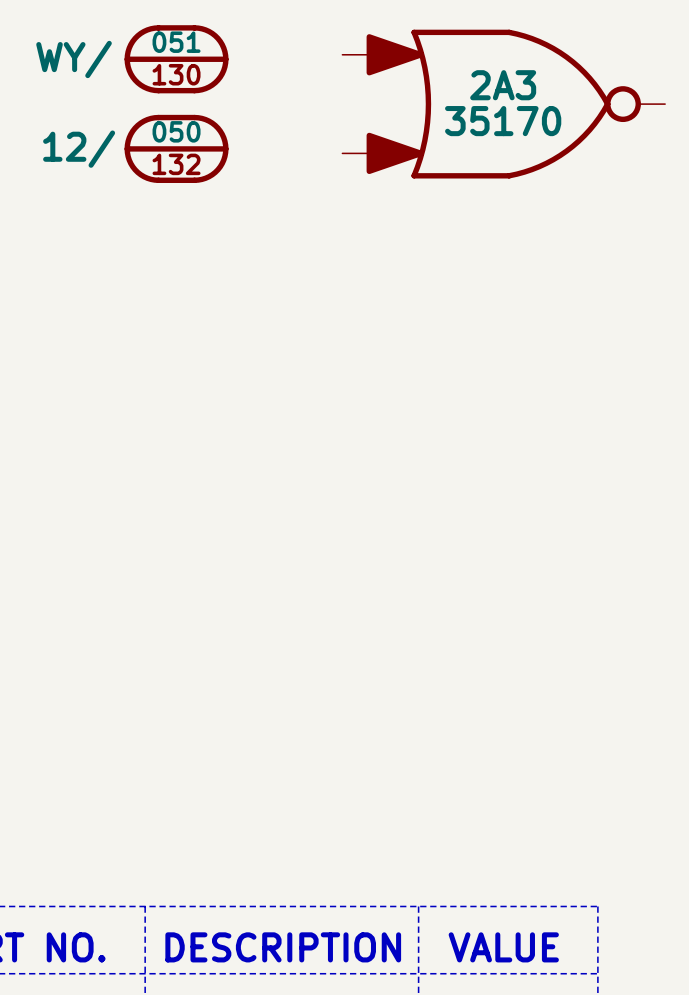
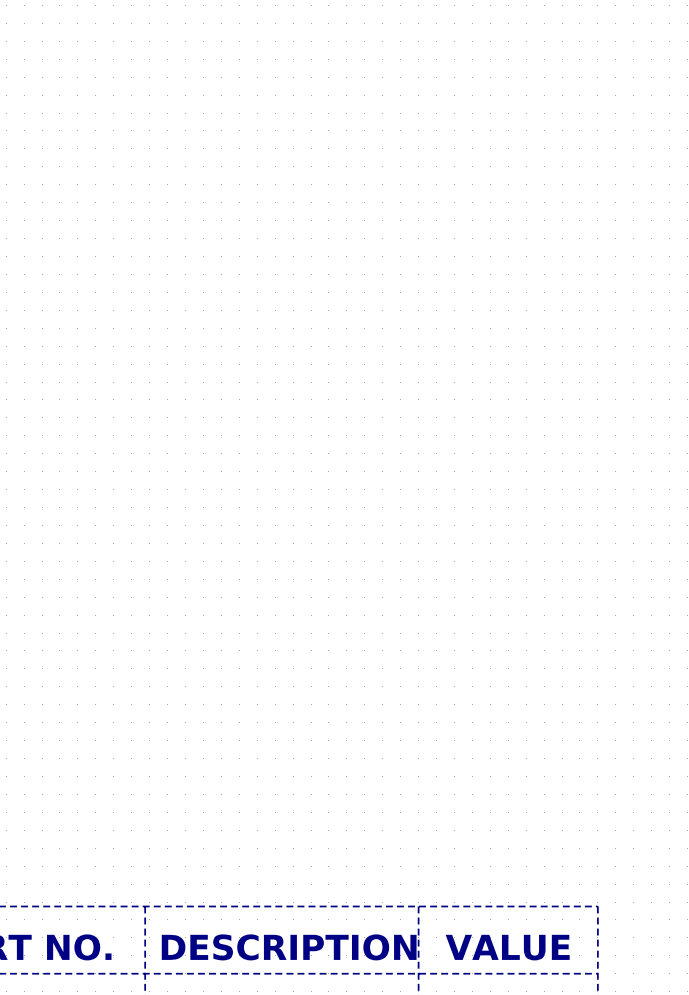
part: (176, 59) -> none
part: (503, 104) -> none
part: (176, 148) -> none

